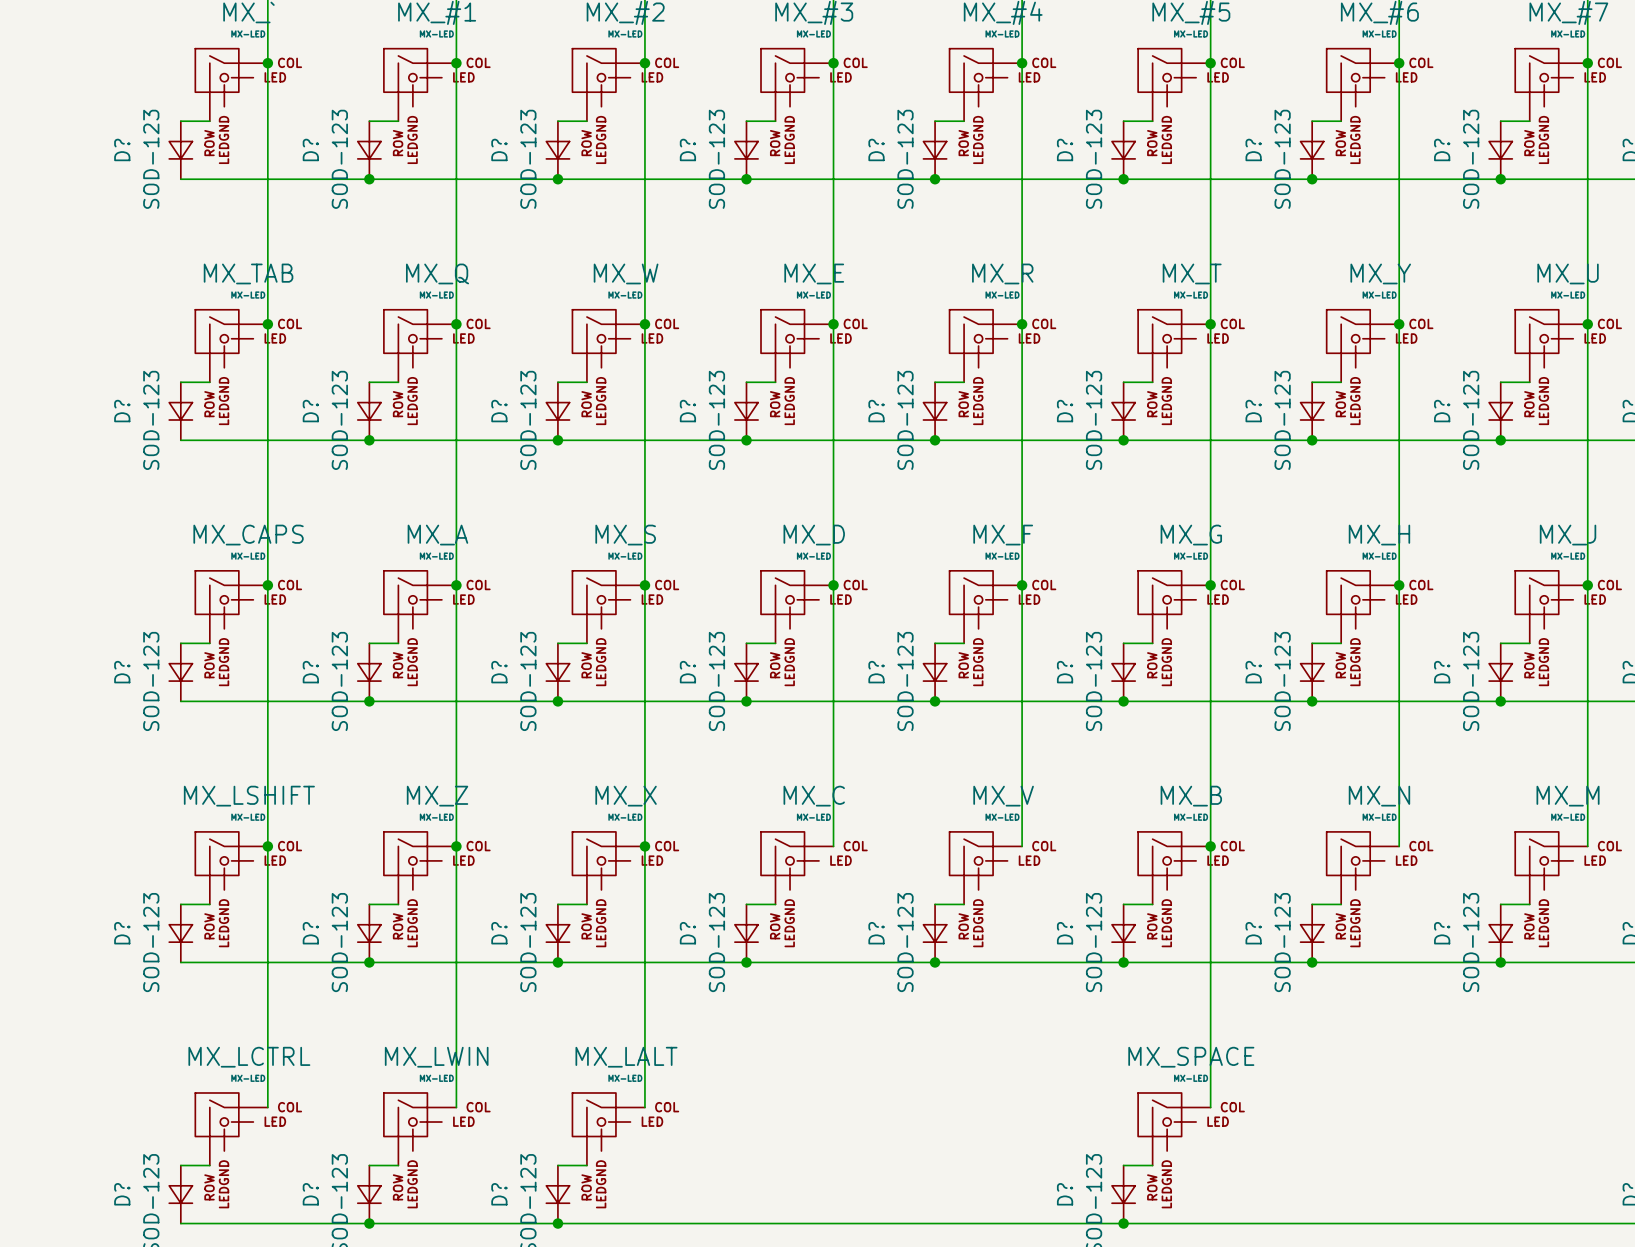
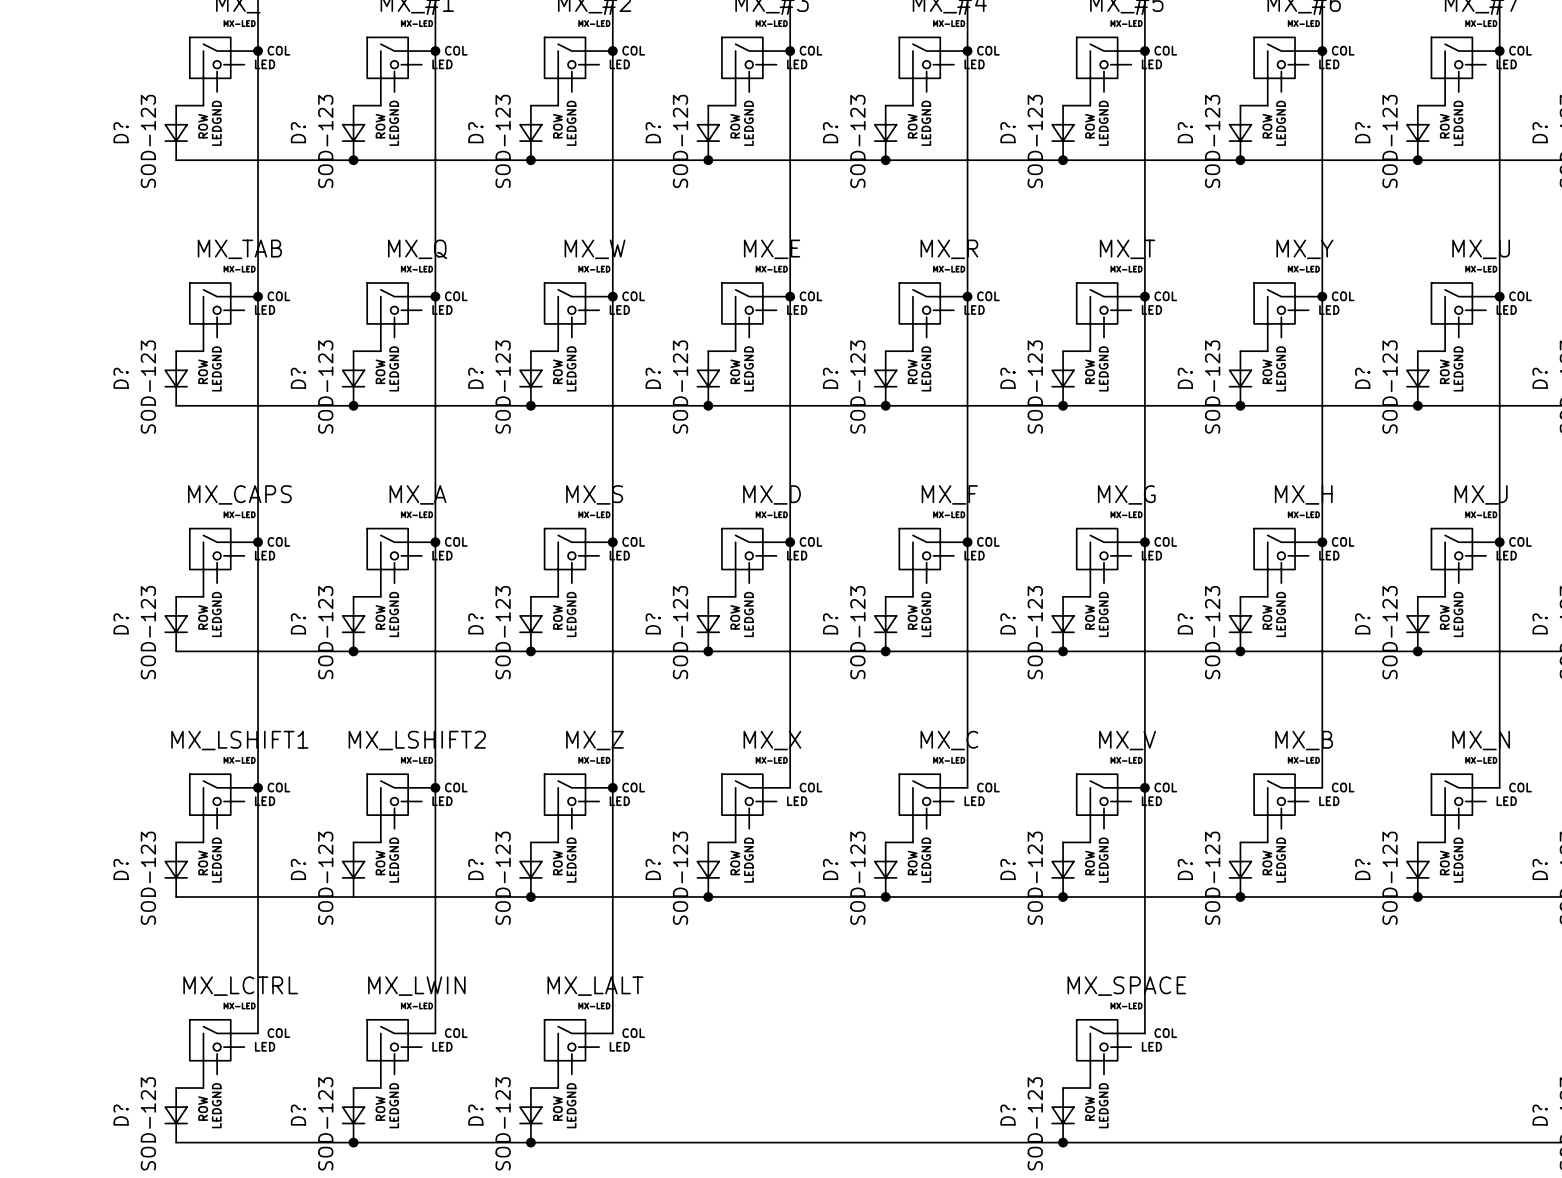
MX_LSHIFT name: MX_LSHIFT (249, 796) -> MX_LSHIFT1 (239, 740)
MX_Z name: MX_Z (437, 796) -> MX_LSHIFT2 (417, 740)
MX_X name: MX_X (626, 796) -> MX_Z (595, 740)
MX_C name: MX_C (814, 796) -> MX_X (772, 740)
MX_V name: MX_V (1003, 796) -> MX_C (949, 740)
MX_B name: MX_B (1191, 796) -> MX_V (1127, 740)
MX_N name: MX_N (1379, 796) -> MX_B (1304, 740)
MX_M name: MX_M (1568, 796) -> MX_N (1481, 740)
junction: (369, 962) -> none

